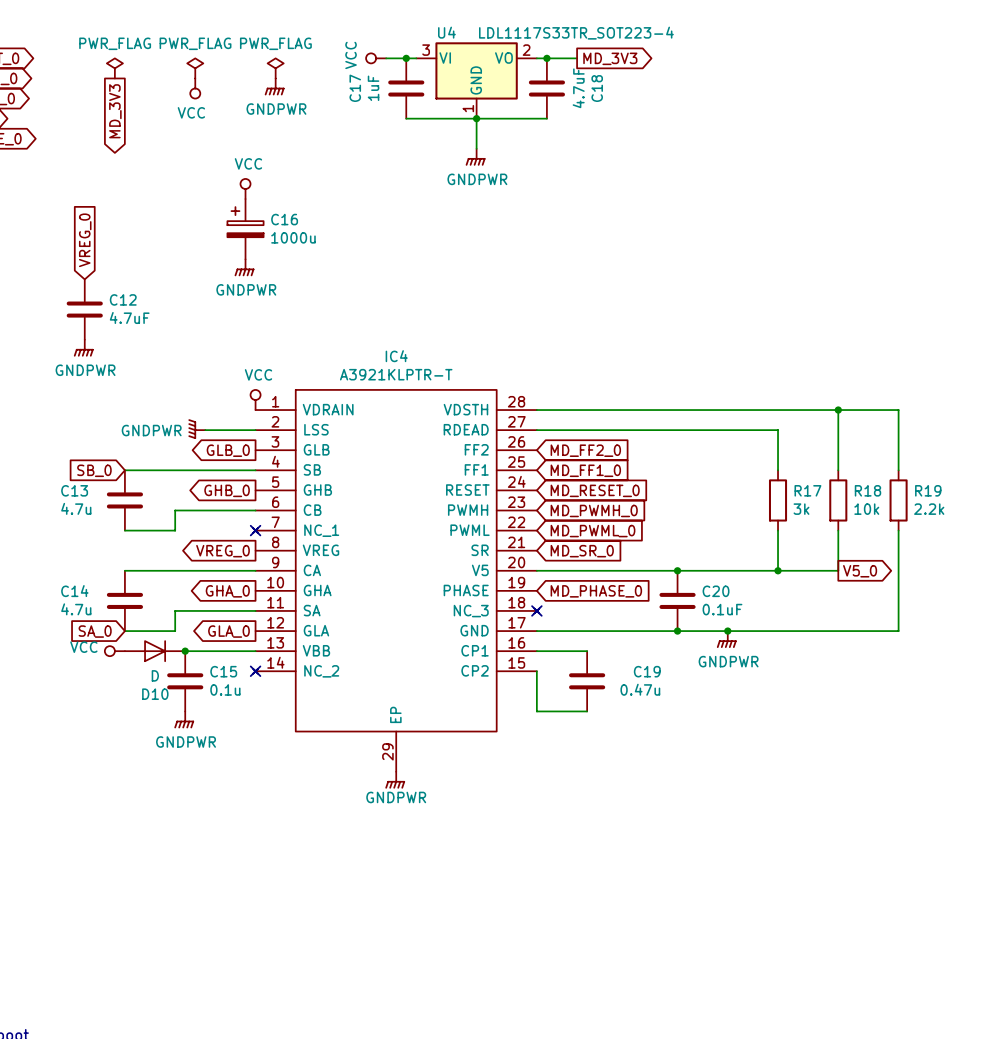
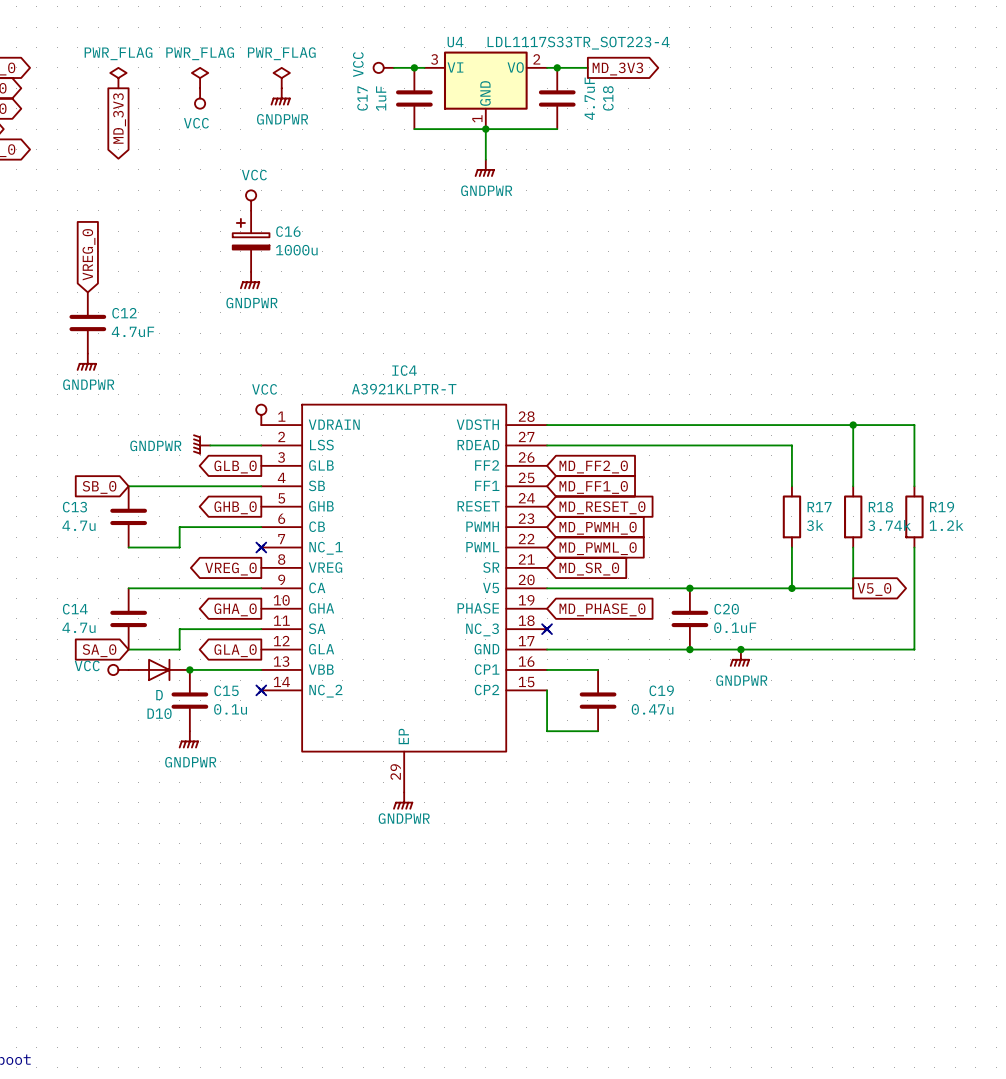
R18 value: 10k (866, 509) -> 3.74k (889, 525)
R19 value: 2.2k (929, 509) -> 1.2k (946, 525)

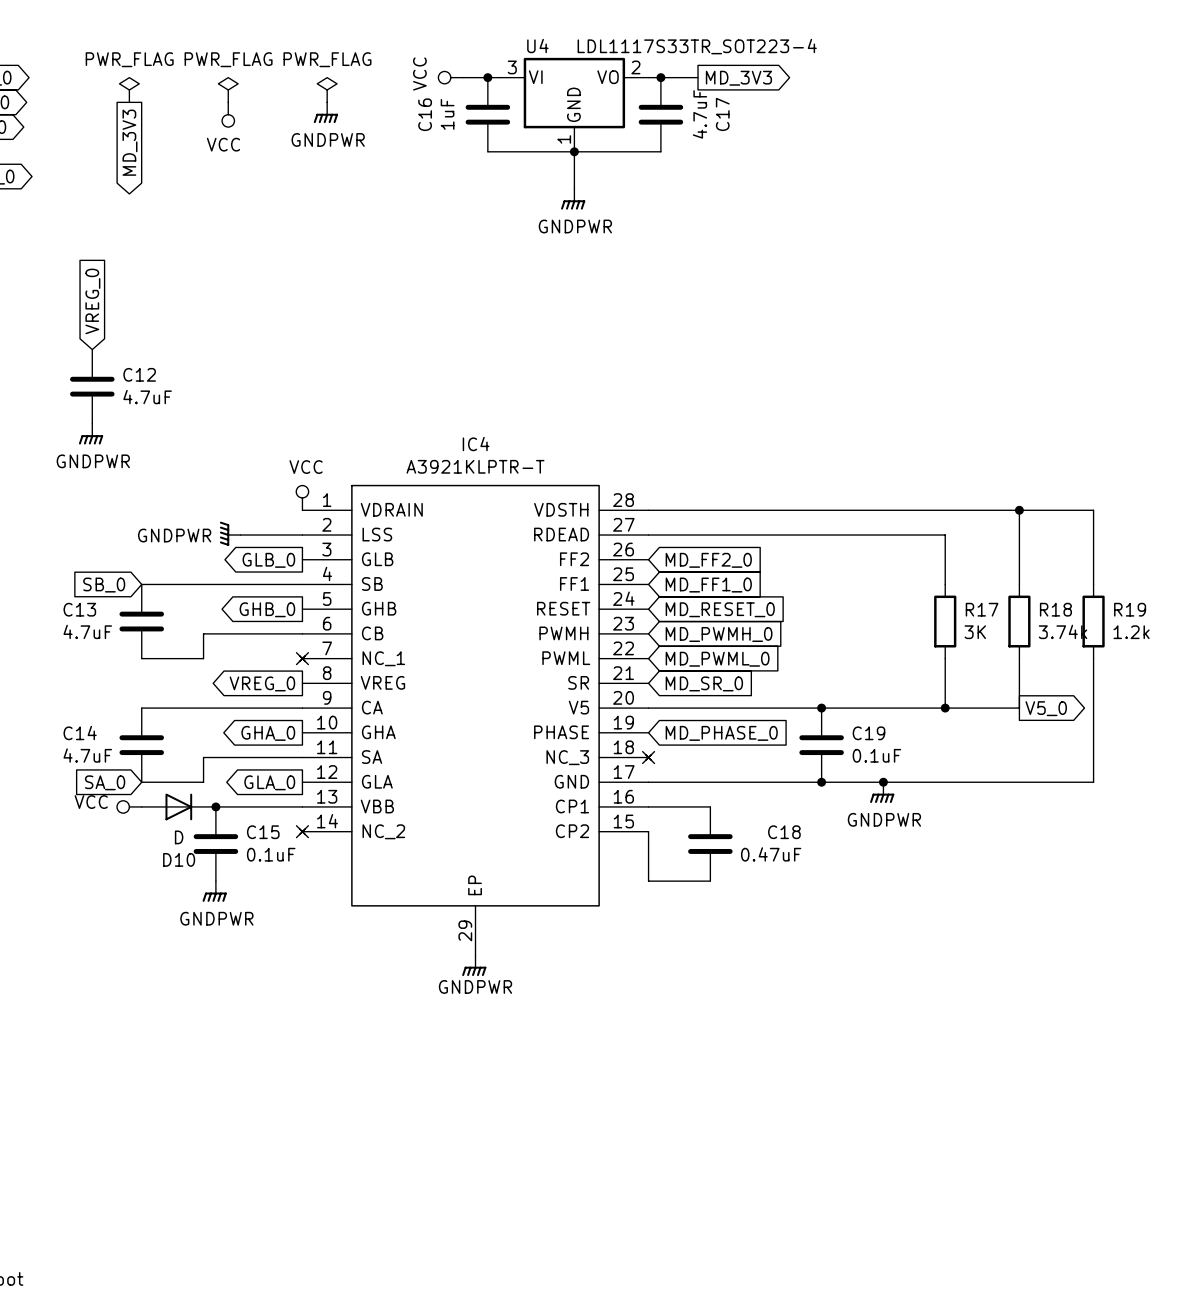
C17 name: C17 (362, 98) -> C16 (425, 114)
C18 name: C18 (608, 98) -> C17 (722, 114)
power symbol: VCC (251, 200) -> none
C16: 1000u (251, 241) -> none
power symbol: GNDPWR (250, 280) -> none
C13 value: 4.7u (78, 525) -> 4.7uF (87, 631)
R17 value: 3k (815, 525) -> 3K (975, 632)
C20 name: C20 (726, 609) -> C19 (868, 733)
C14 value: 4.7u (78, 627) -> 4.7uF (87, 755)
C19 name: C19 (661, 690) -> C18 (784, 832)
C15 value: 0.1u (230, 709) -> 0.1uF (271, 854)
C19 value: 0.47u (652, 709) -> 0.47uF (771, 854)

